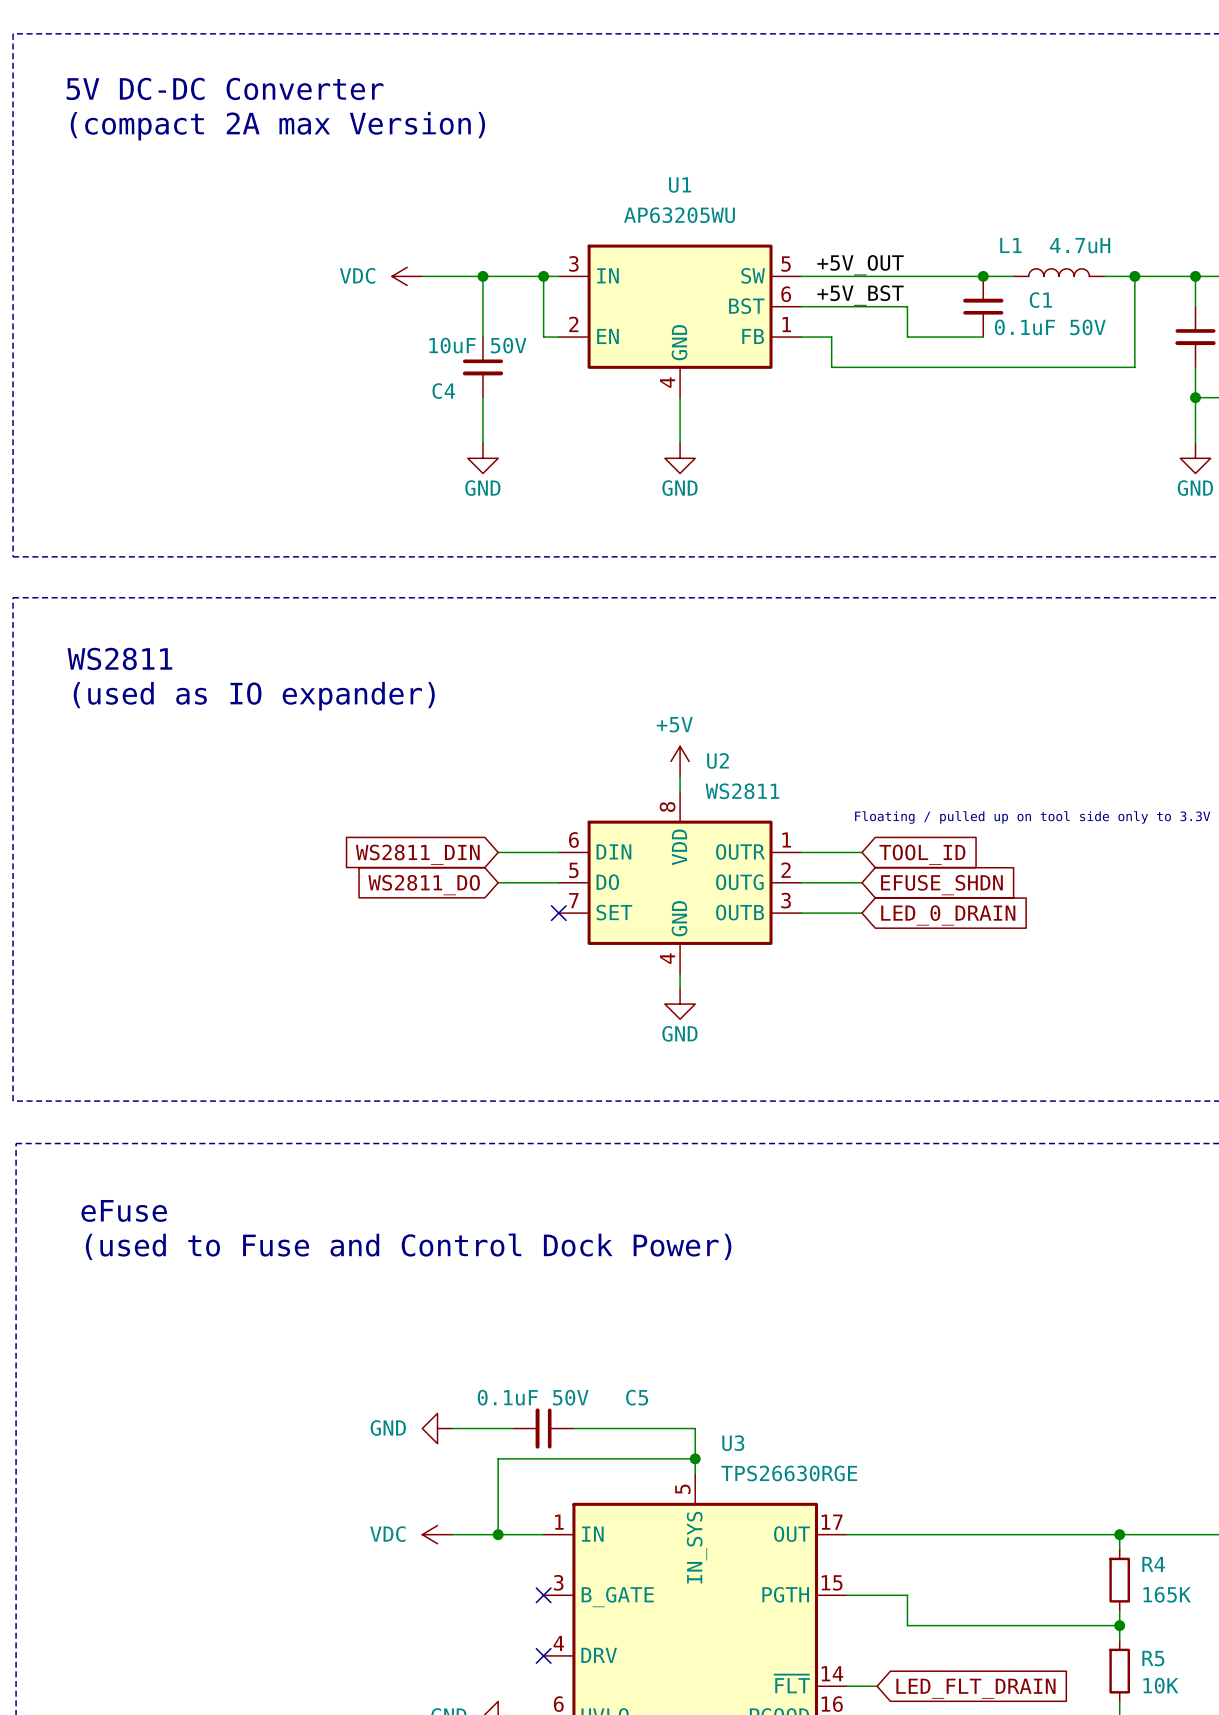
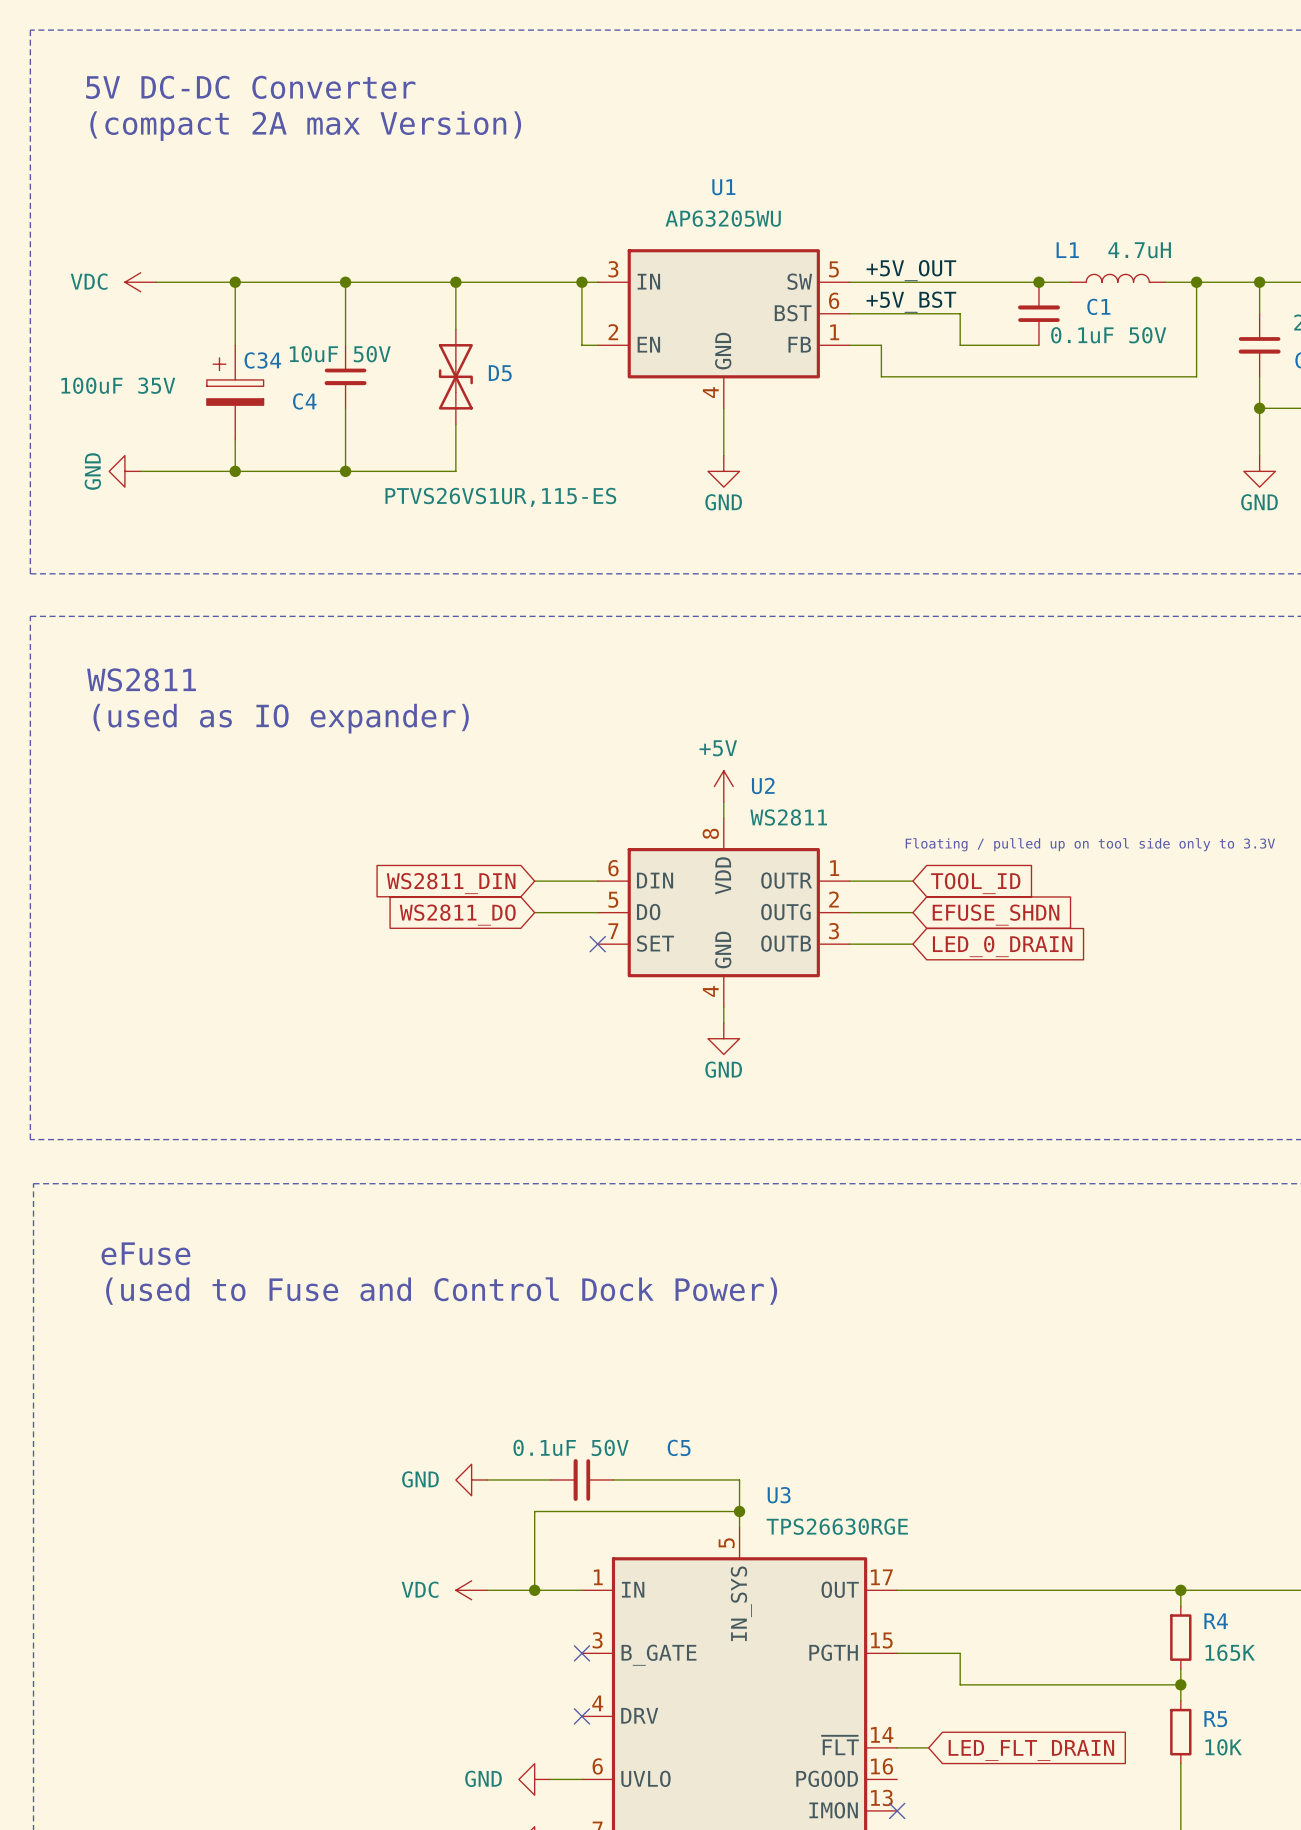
wire: none -> (156, 282) (455, 282) (455, 329)
wire: none -> (235, 282) (235, 345)
junction: none -> (235, 282)
junction: none -> (345, 282)
power symbol position: VDC (407, 276) -> VDC (140, 282)
wire: (482, 276) (482, 337) -> (345, 282) (345, 345)
junction position: (482, 276) -> (455, 282)
D5: none -> PTVS26VS1UR,115-ES (455, 376)
C4 position: (482, 367) -> (345, 376)
C34: none -> 100uF 35V (235, 392)
wire: none -> (345, 408) (345, 471)
wire: (482, 397) (482, 443) -> none
wire: none -> (455, 424) (455, 471) (140, 471)
wire: none -> (235, 439) (235, 471)
power symbol: none -> GND (124, 471)
junction: none -> (235, 471)
junction: none -> (345, 471)
power symbol: GND (482, 458) -> none

